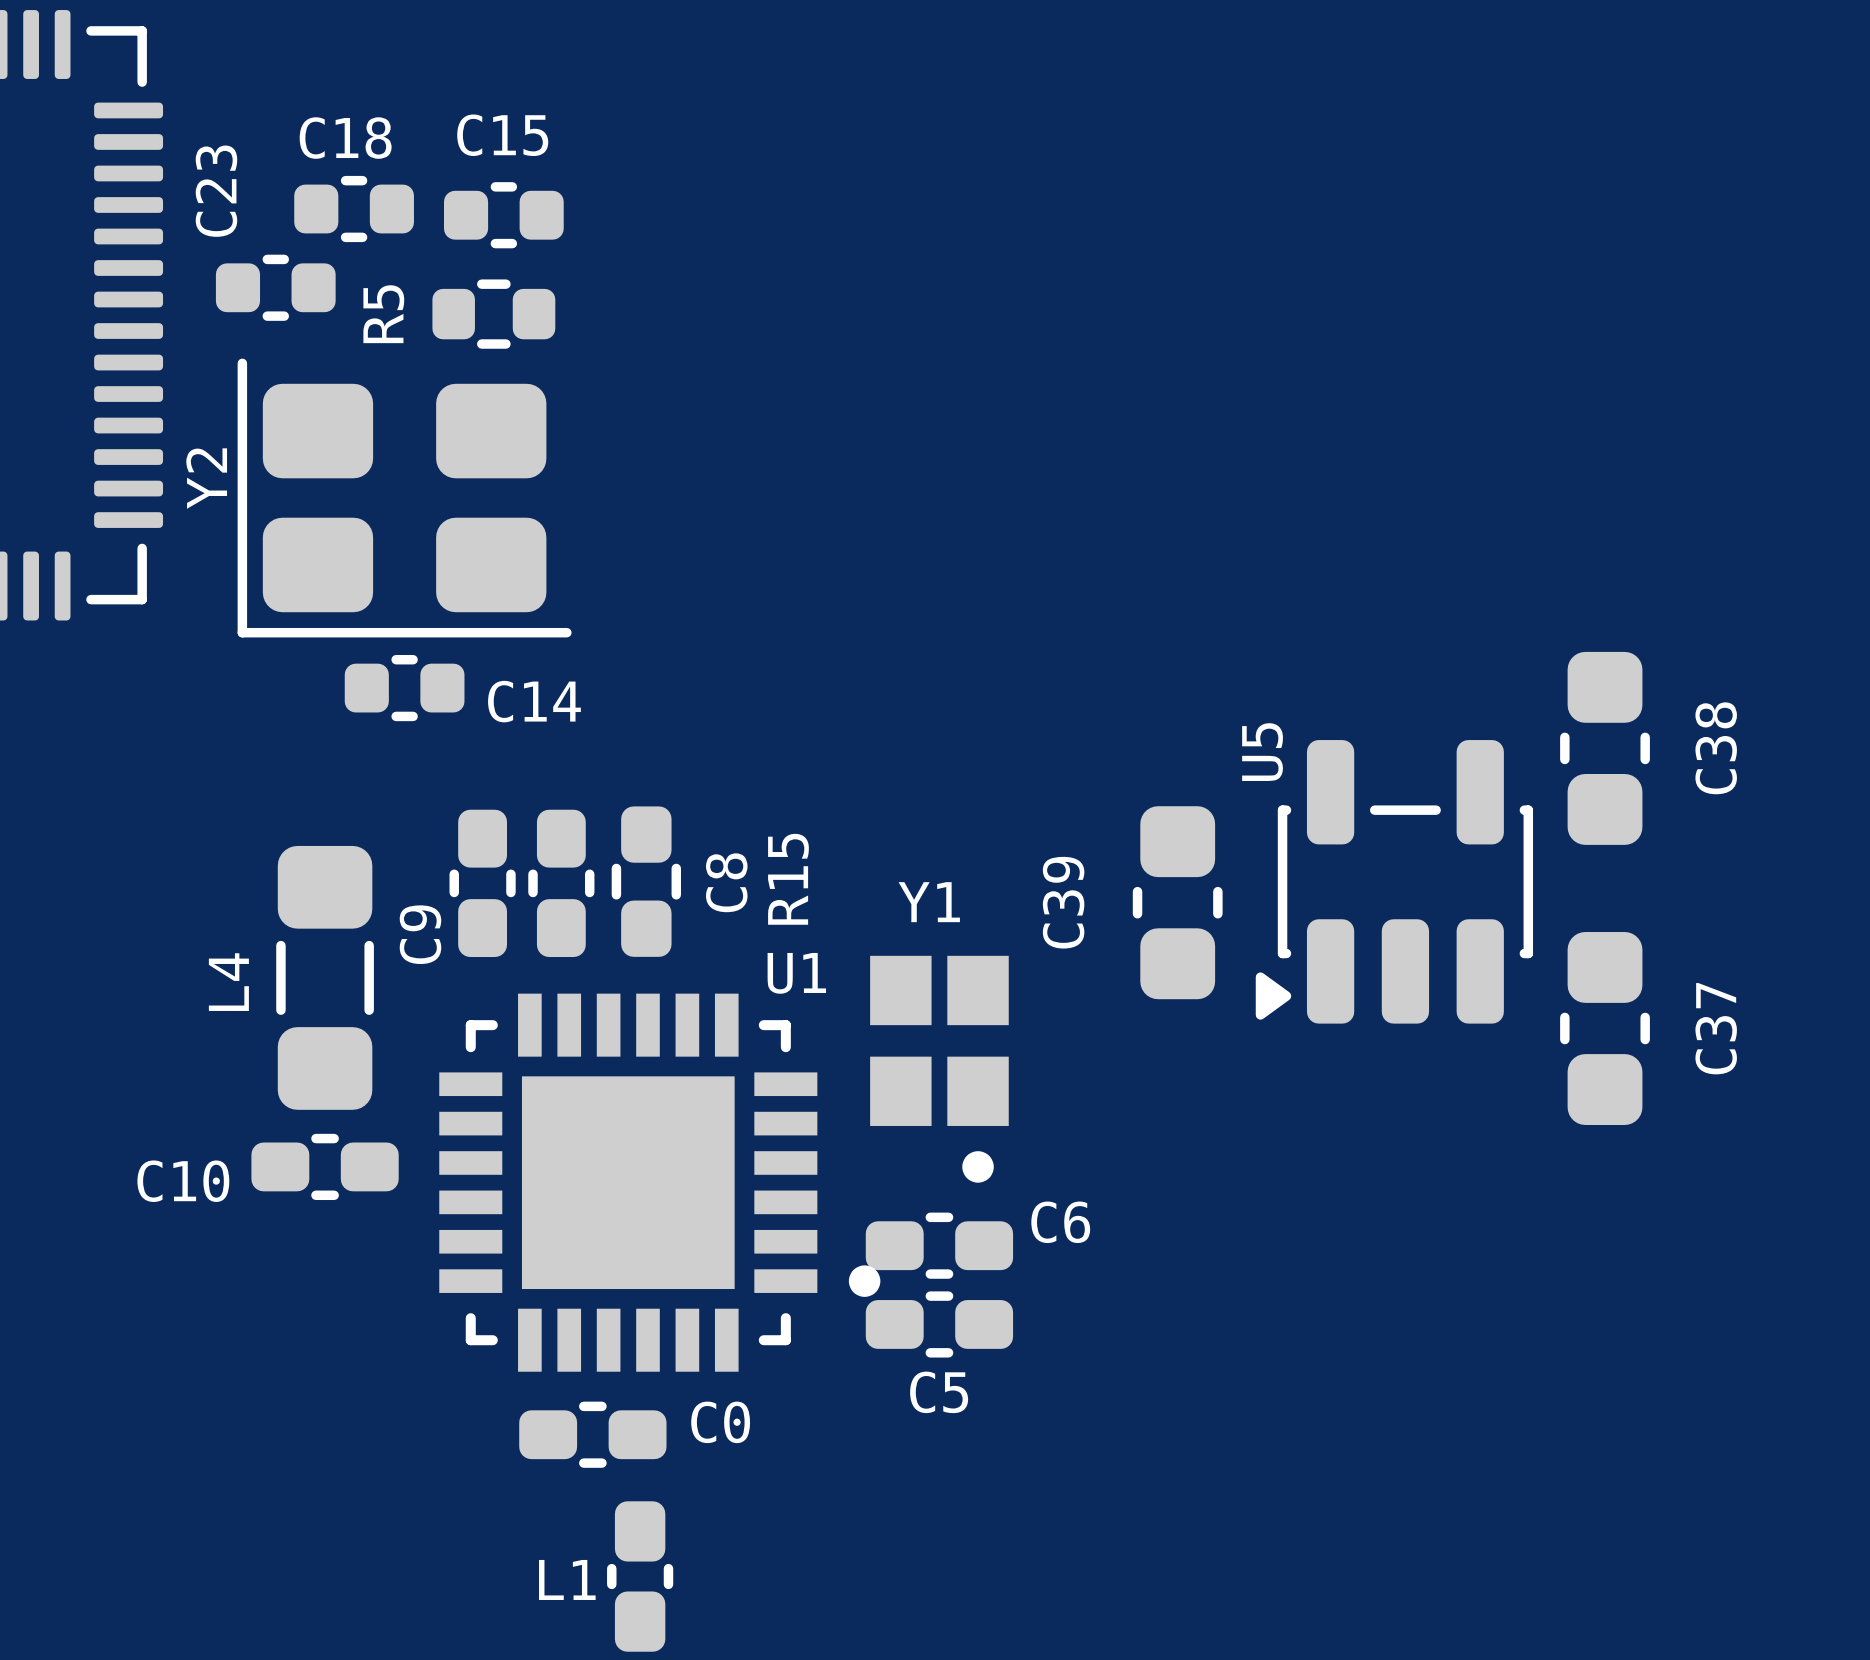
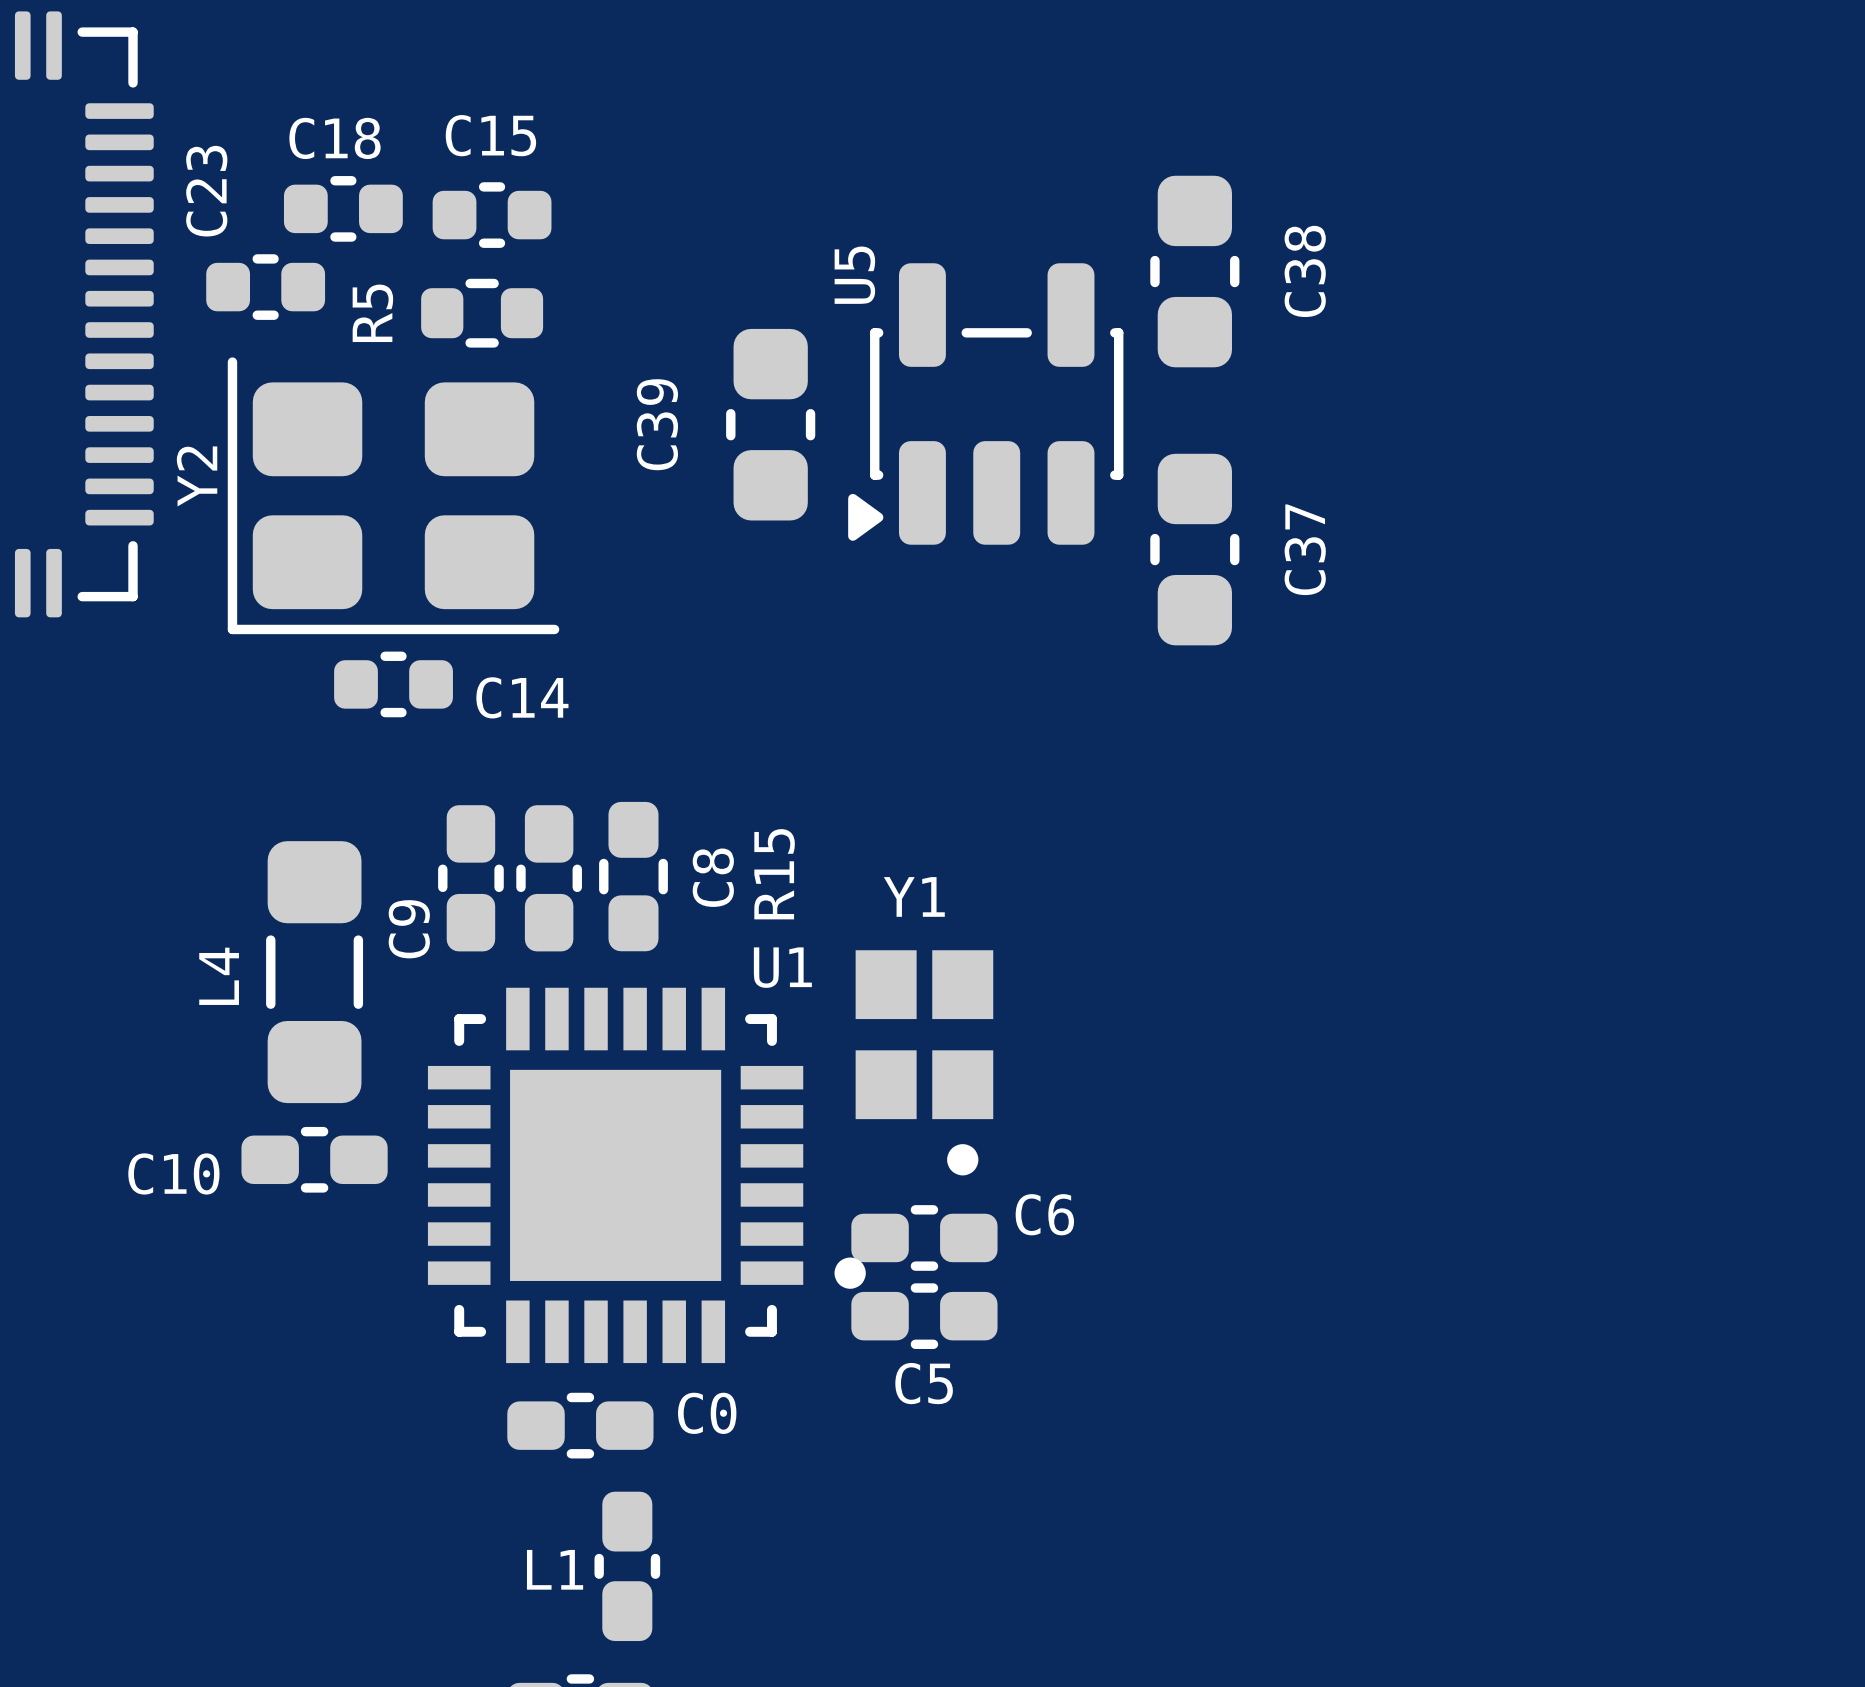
C38 position: (1605, 748) -> (1194, 271)
U5 position: (1394, 881) -> (985, 403)
C39 position: (1177, 902) -> (770, 424)
C37 position: (1605, 1028) -> (1194, 549)

